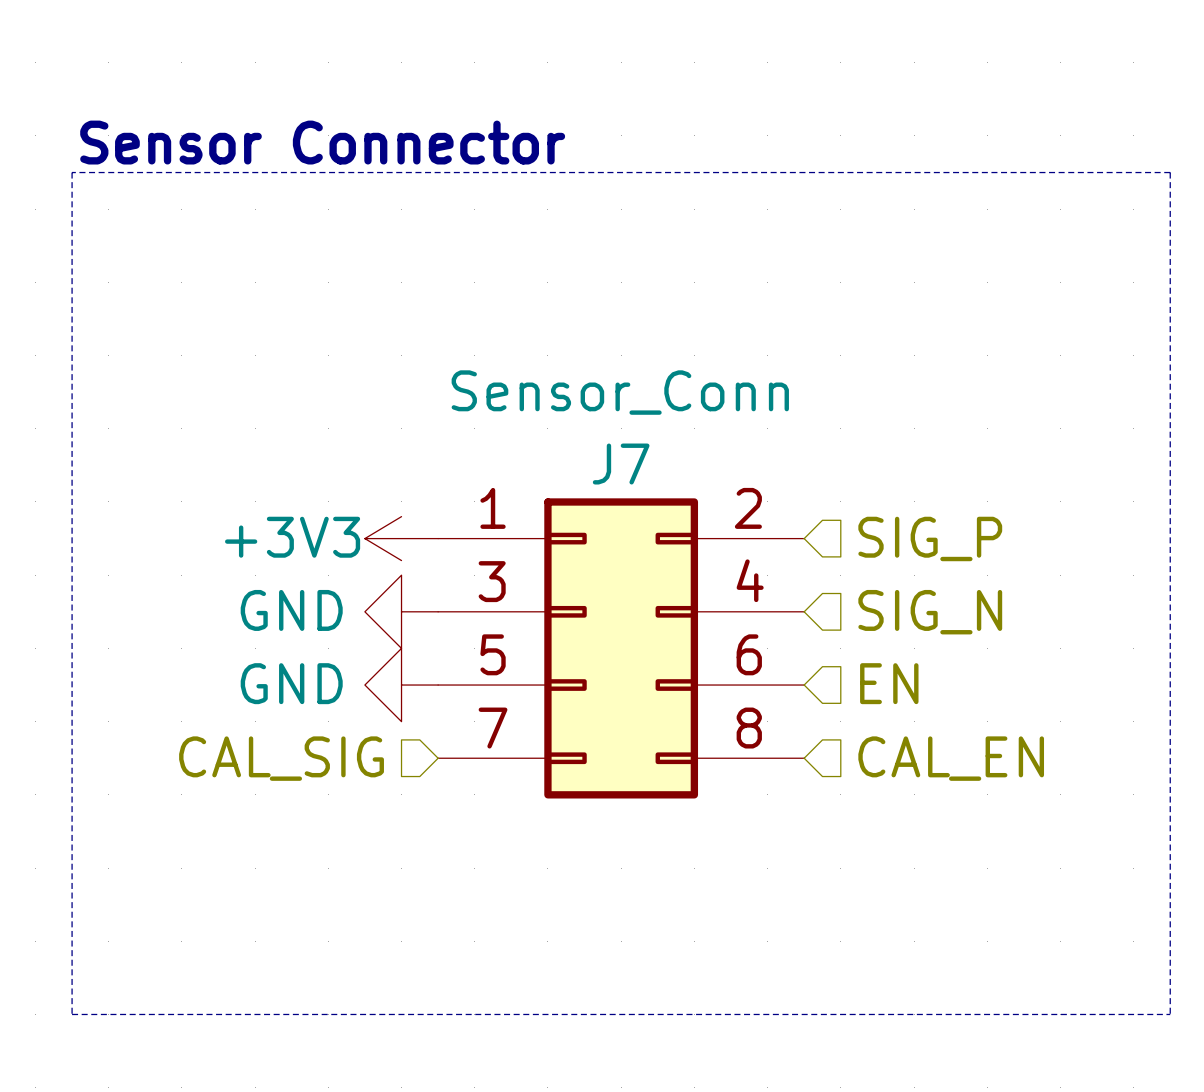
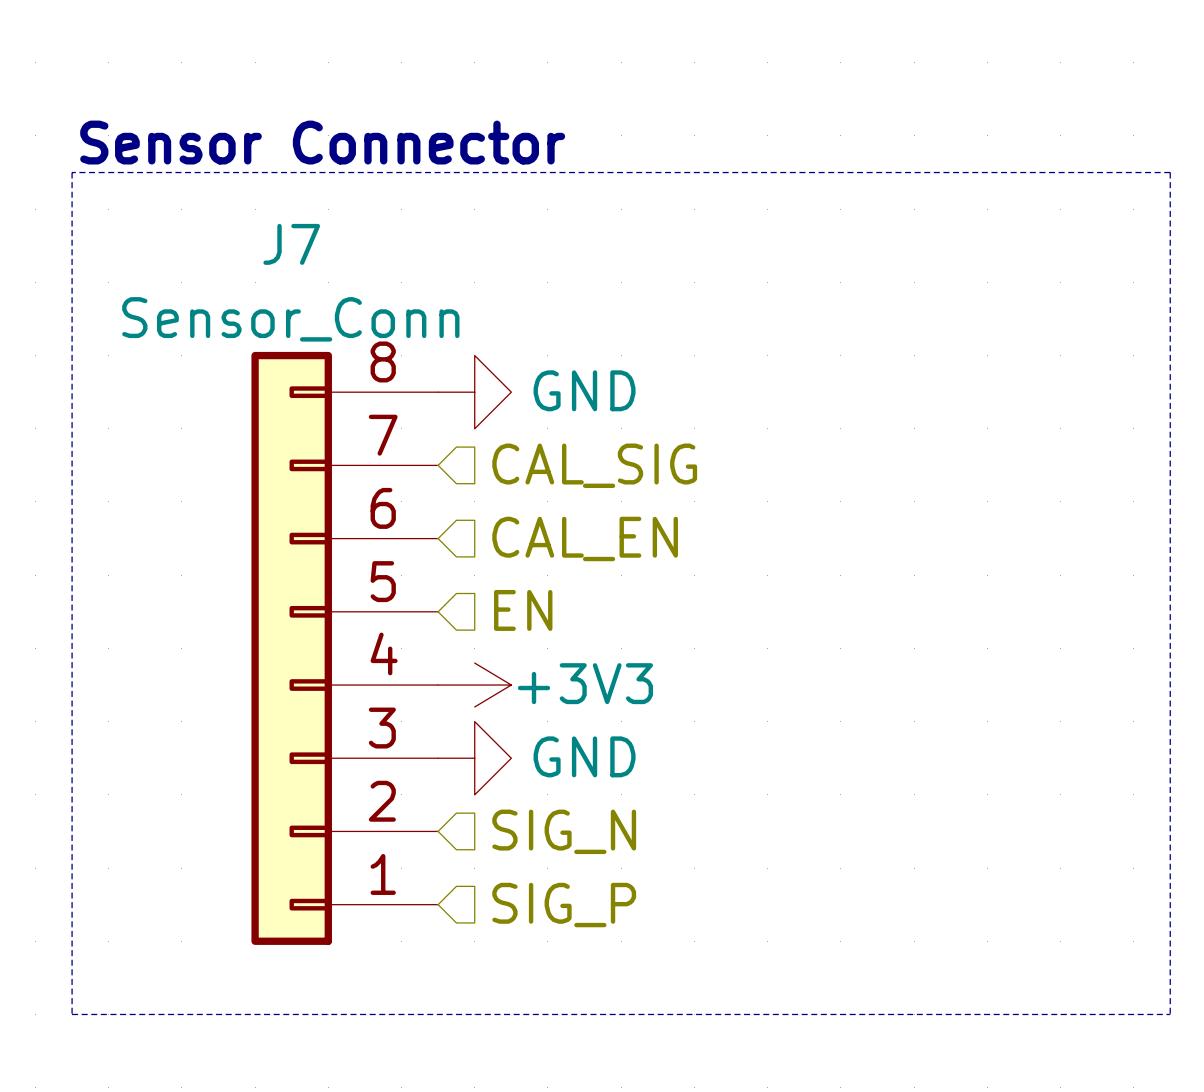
power symbol: none -> GND (474, 392)
J7 value position: Sensor_Conn (620, 392) -> Sensor_Conn (290, 319)
J7 name position: J7 (621, 464) -> J7 (291, 244)
J7 symbol: [438, 498, 805, 799] -> [251, 351, 439, 945]
power symbol rotation: 0° (401, 538) -> 180° (474, 685)
power symbol position: +3V3 (401, 538) -> +3V3 (474, 685)
hierarchical label position: SIG_P (930, 538) -> SIG_P (564, 905)
power symbol: GND (401, 611) -> none
hierarchical label position: SIG_N (930, 612) -> SIG_N (564, 831)
hierarchical label position: EN (889, 683) -> EN (523, 610)
power symbol: GND (401, 685) -> none
hierarchical label rotation: 0° (281, 758) -> 180° (594, 465)
hierarchical label position: CAL_SIG (281, 758) -> CAL_SIG (594, 465)
power symbol: none -> GND (474, 758)
hierarchical label position: CAL_EN (951, 758) -> CAL_EN (585, 538)

